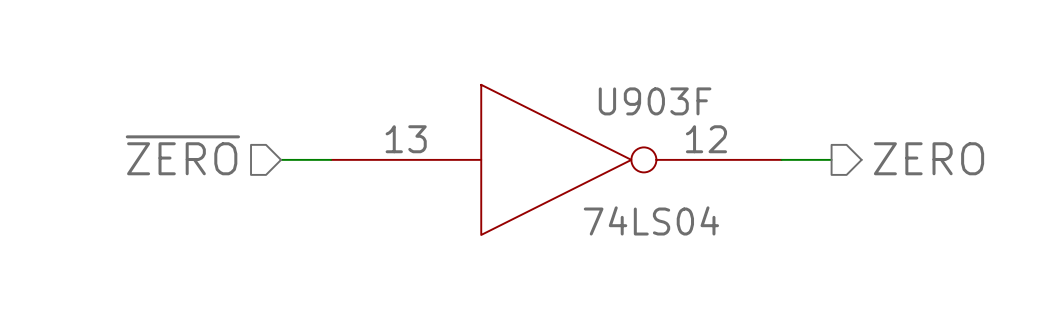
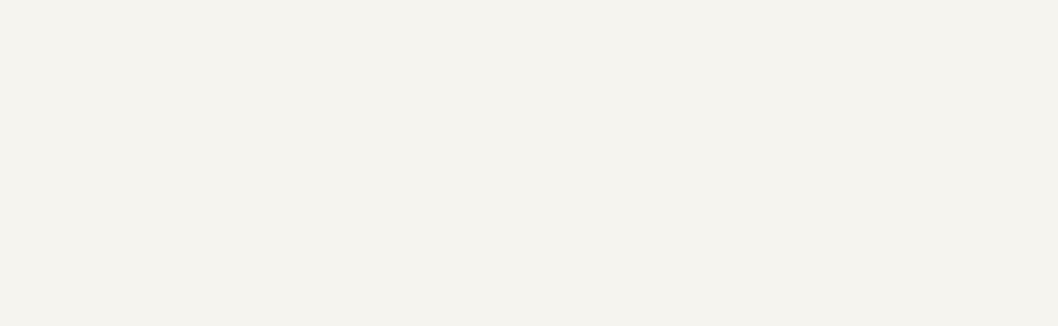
hierarchical label: ~{ZERO} (182, 155) -> none
hierarchical label: ZERO (929, 158) -> none
wire: (281, 159) (331, 159) -> none
U903F: 74LS04 (556, 159) -> none
wire: (781, 159) (831, 159) -> none

